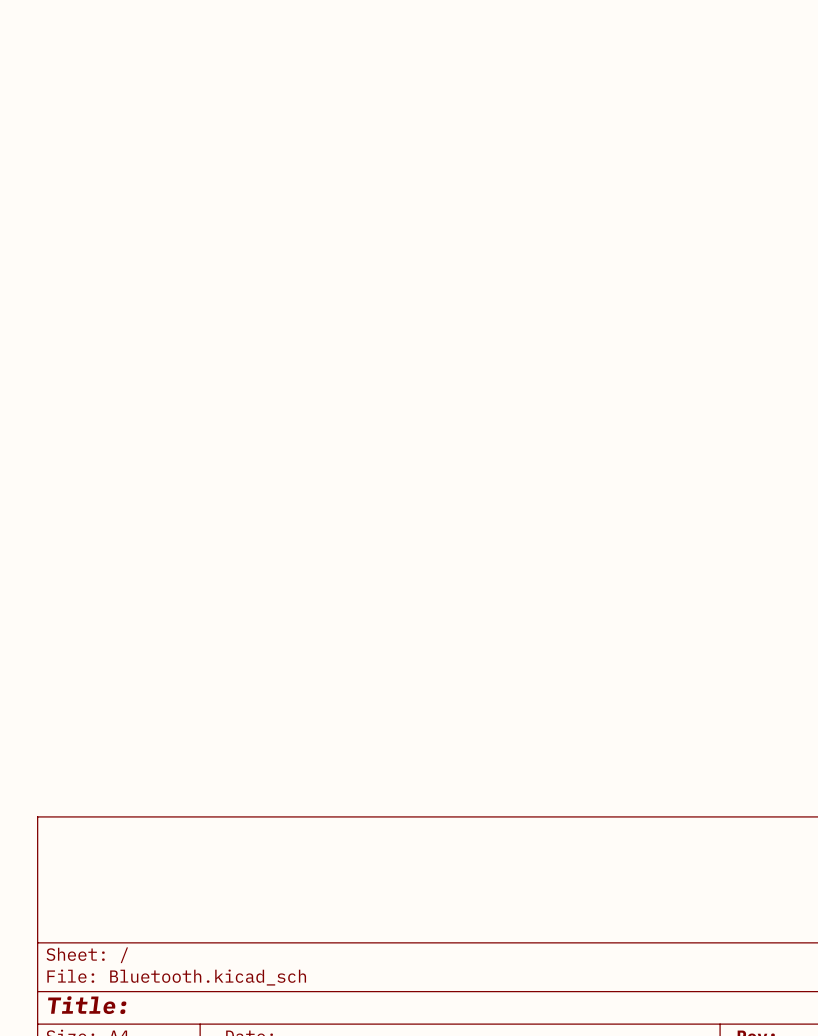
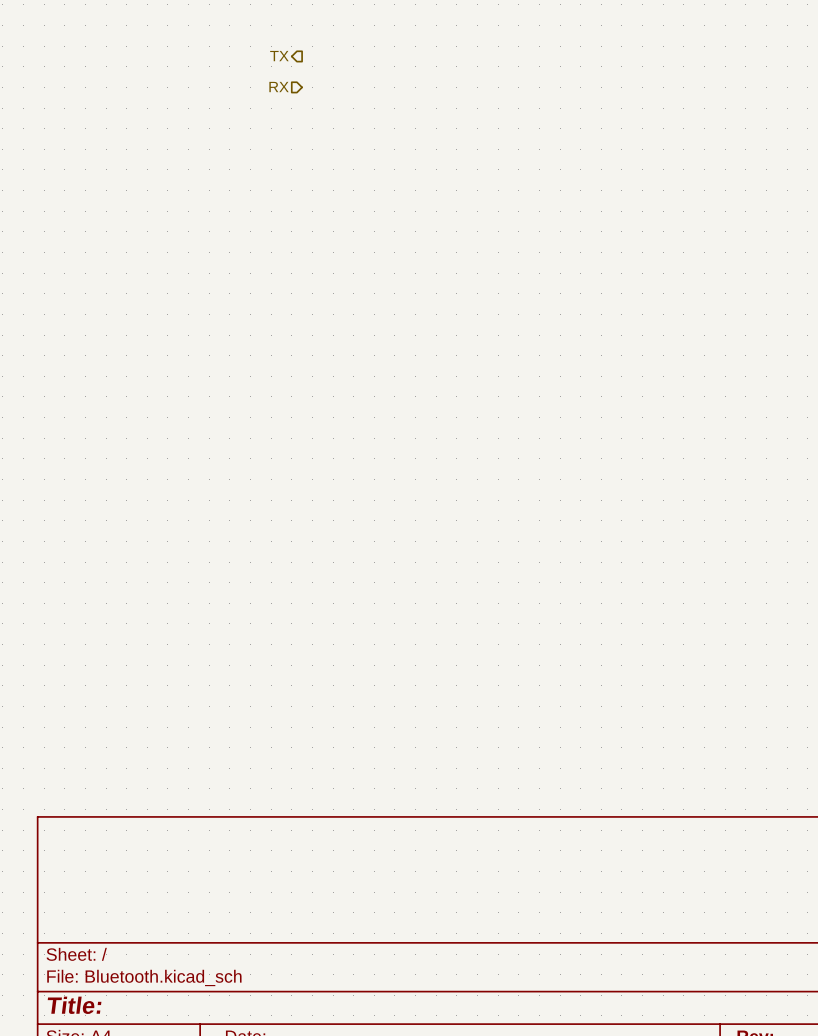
hierarchical label: none -> TX (279, 56)
hierarchical label: none -> RX (279, 87)

